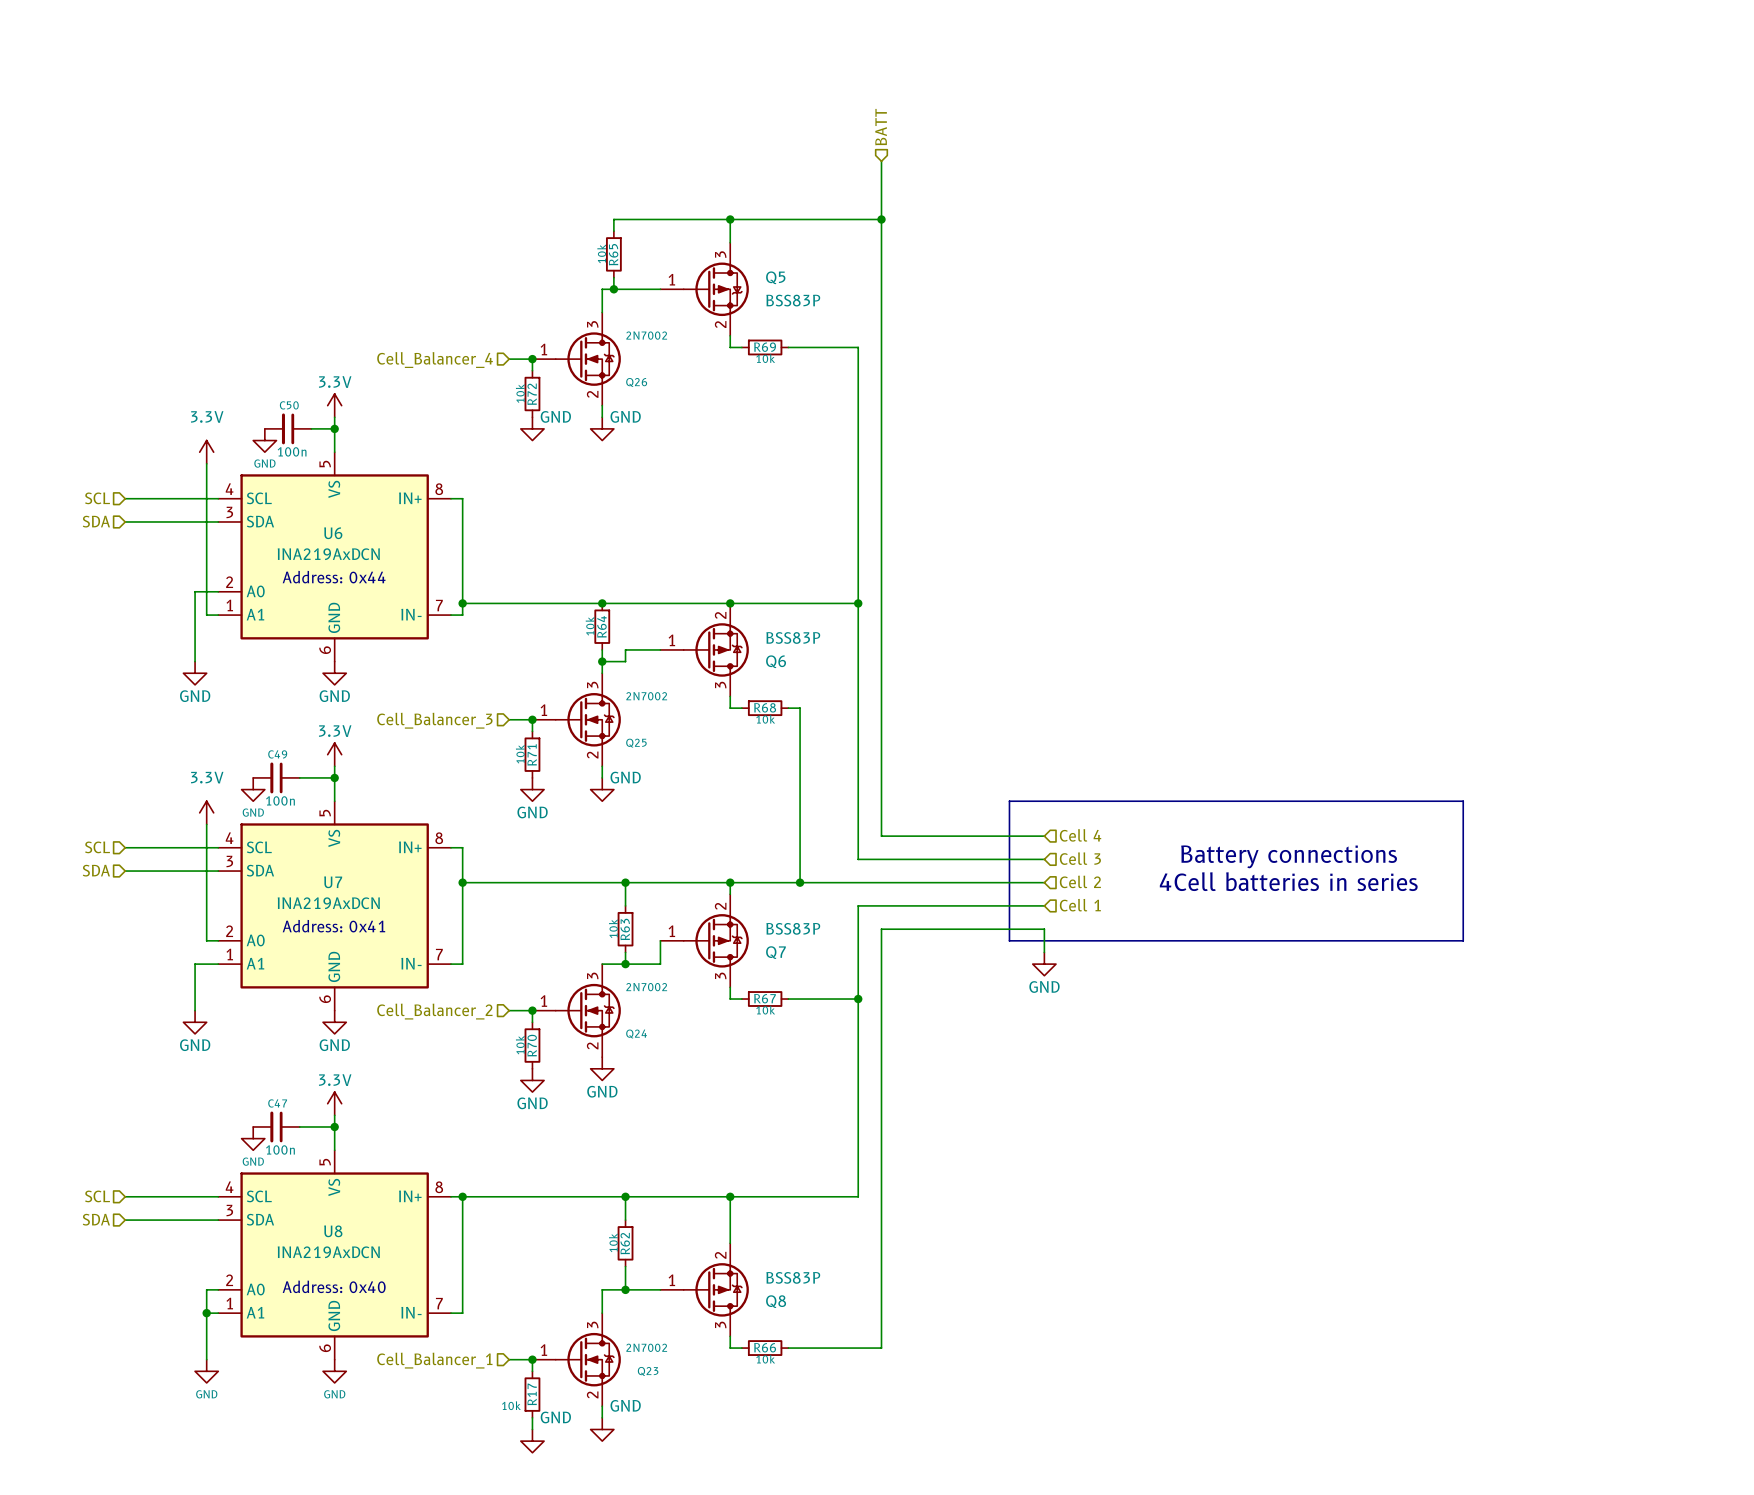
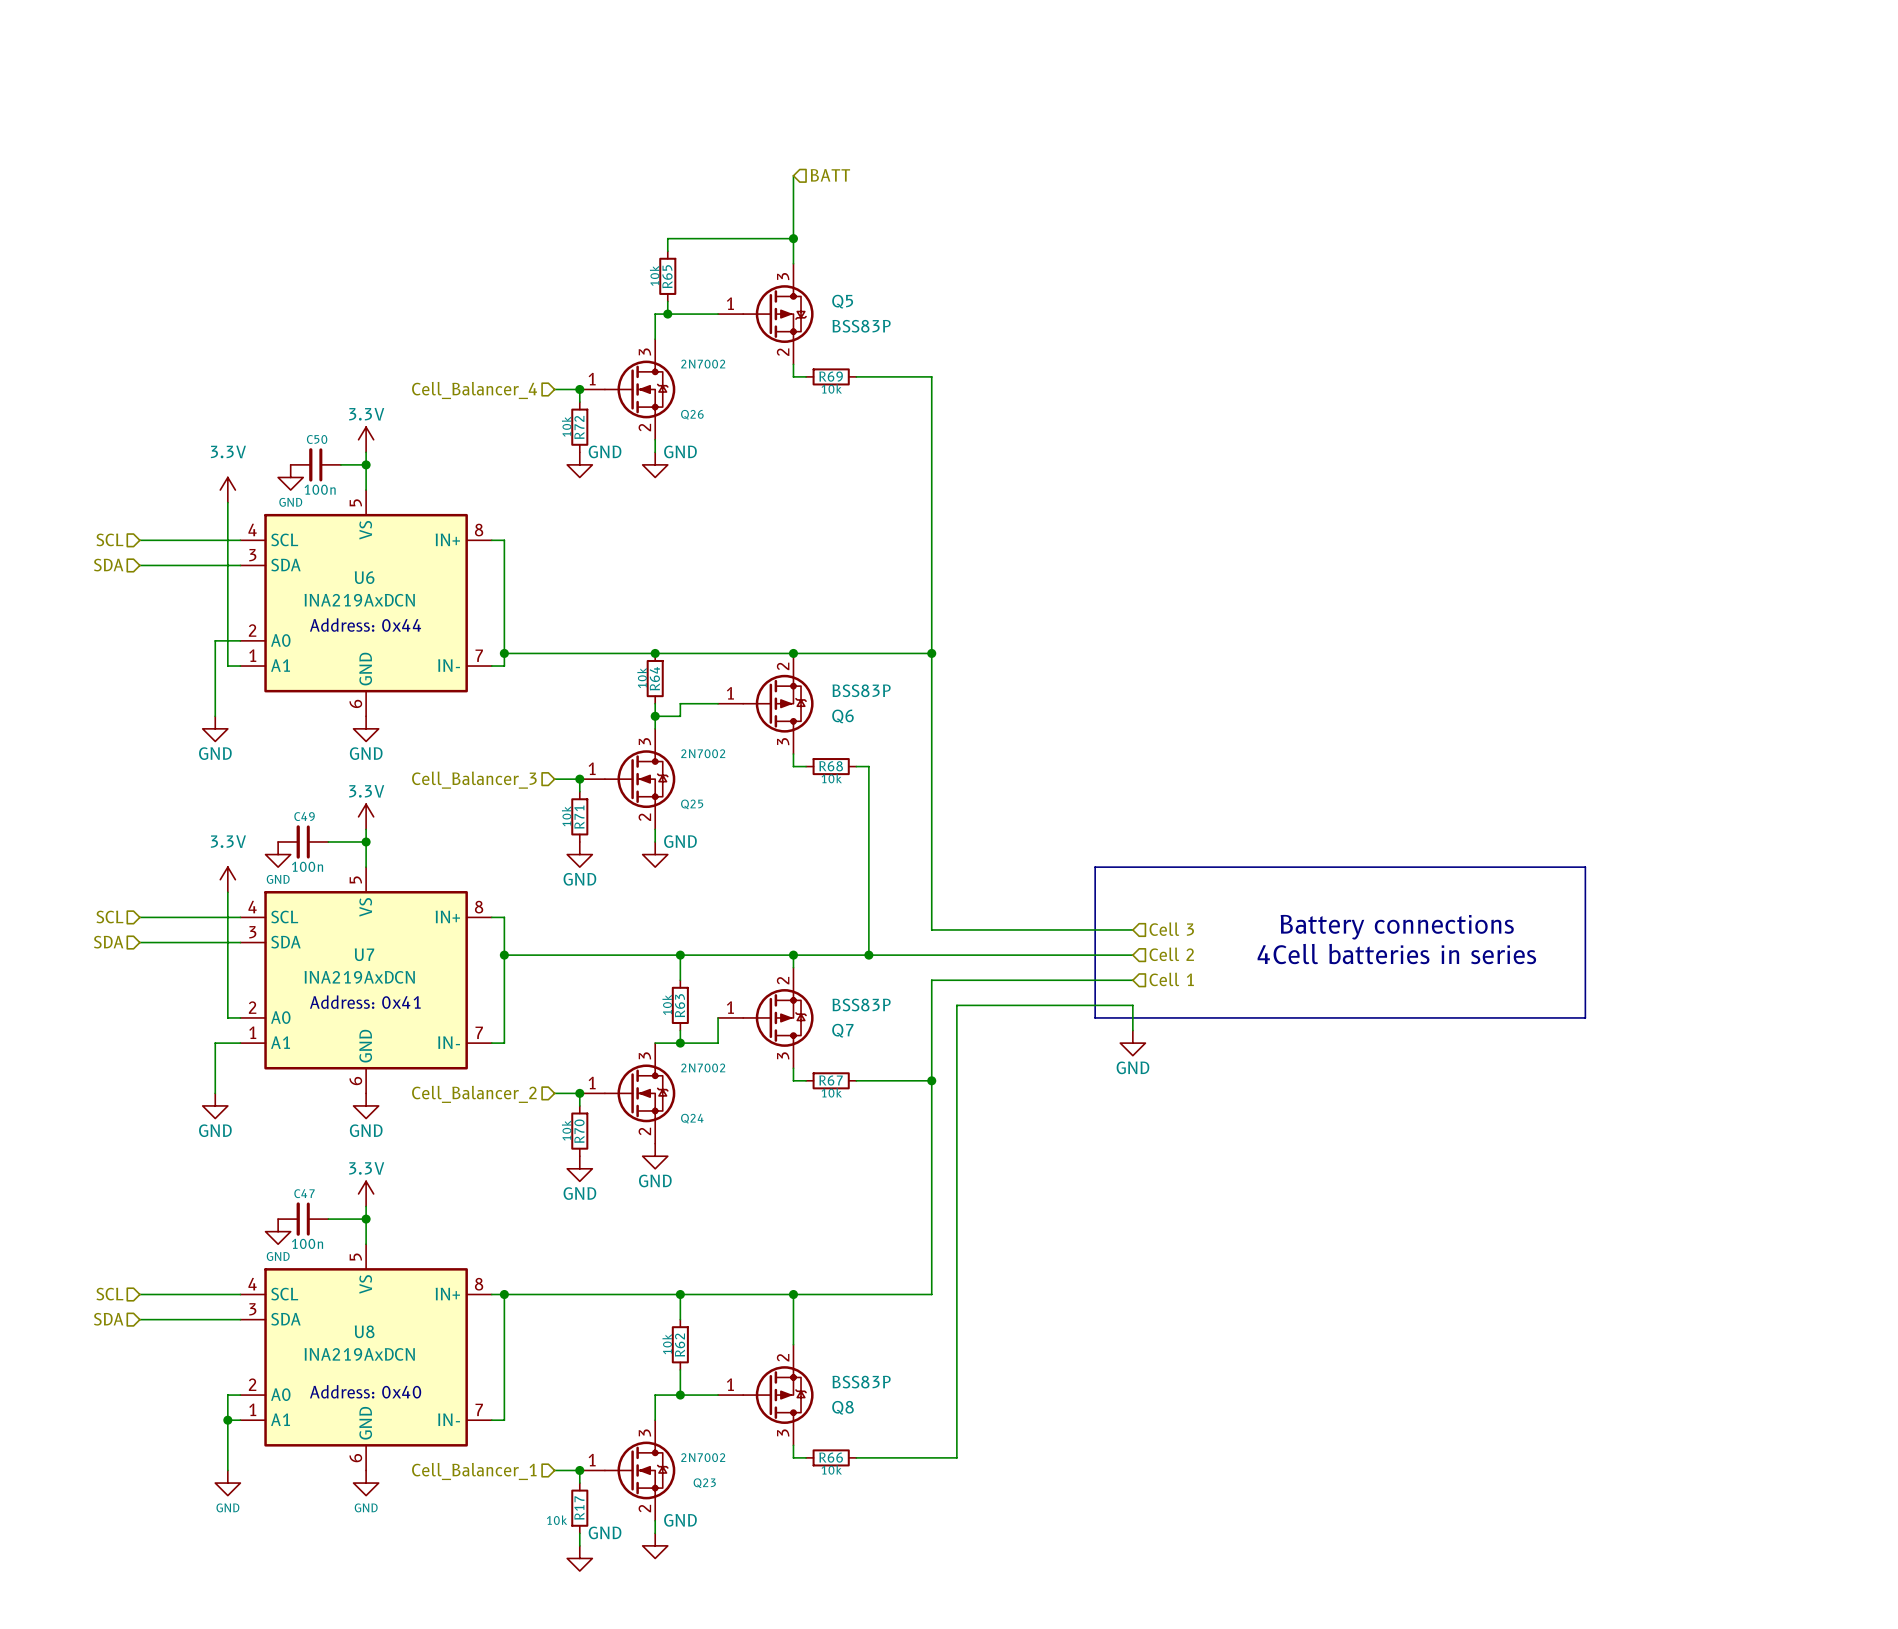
hierarchical label rotation: 0° (881, 127) -> 90° clockwise (830, 175)
hierarchical label position: BATT (881, 127) -> BATT (830, 175)
wire: (881, 161) (881, 836) (1044, 836) -> none
wire: (730, 219) (881, 219) -> (793, 238) (793, 175)
junction: (881, 219) -> none
hierarchical label: Cell 4 (1080, 835) -> none

